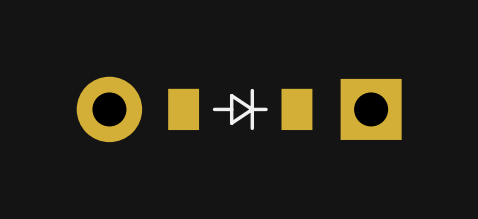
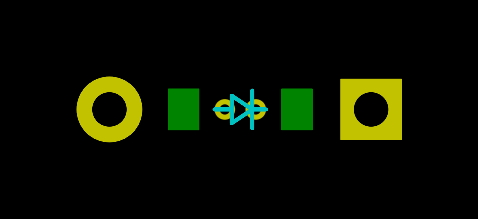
part: none -> (239, 109)
part: none -> (240, 109)
part: none -> (240, 109)

